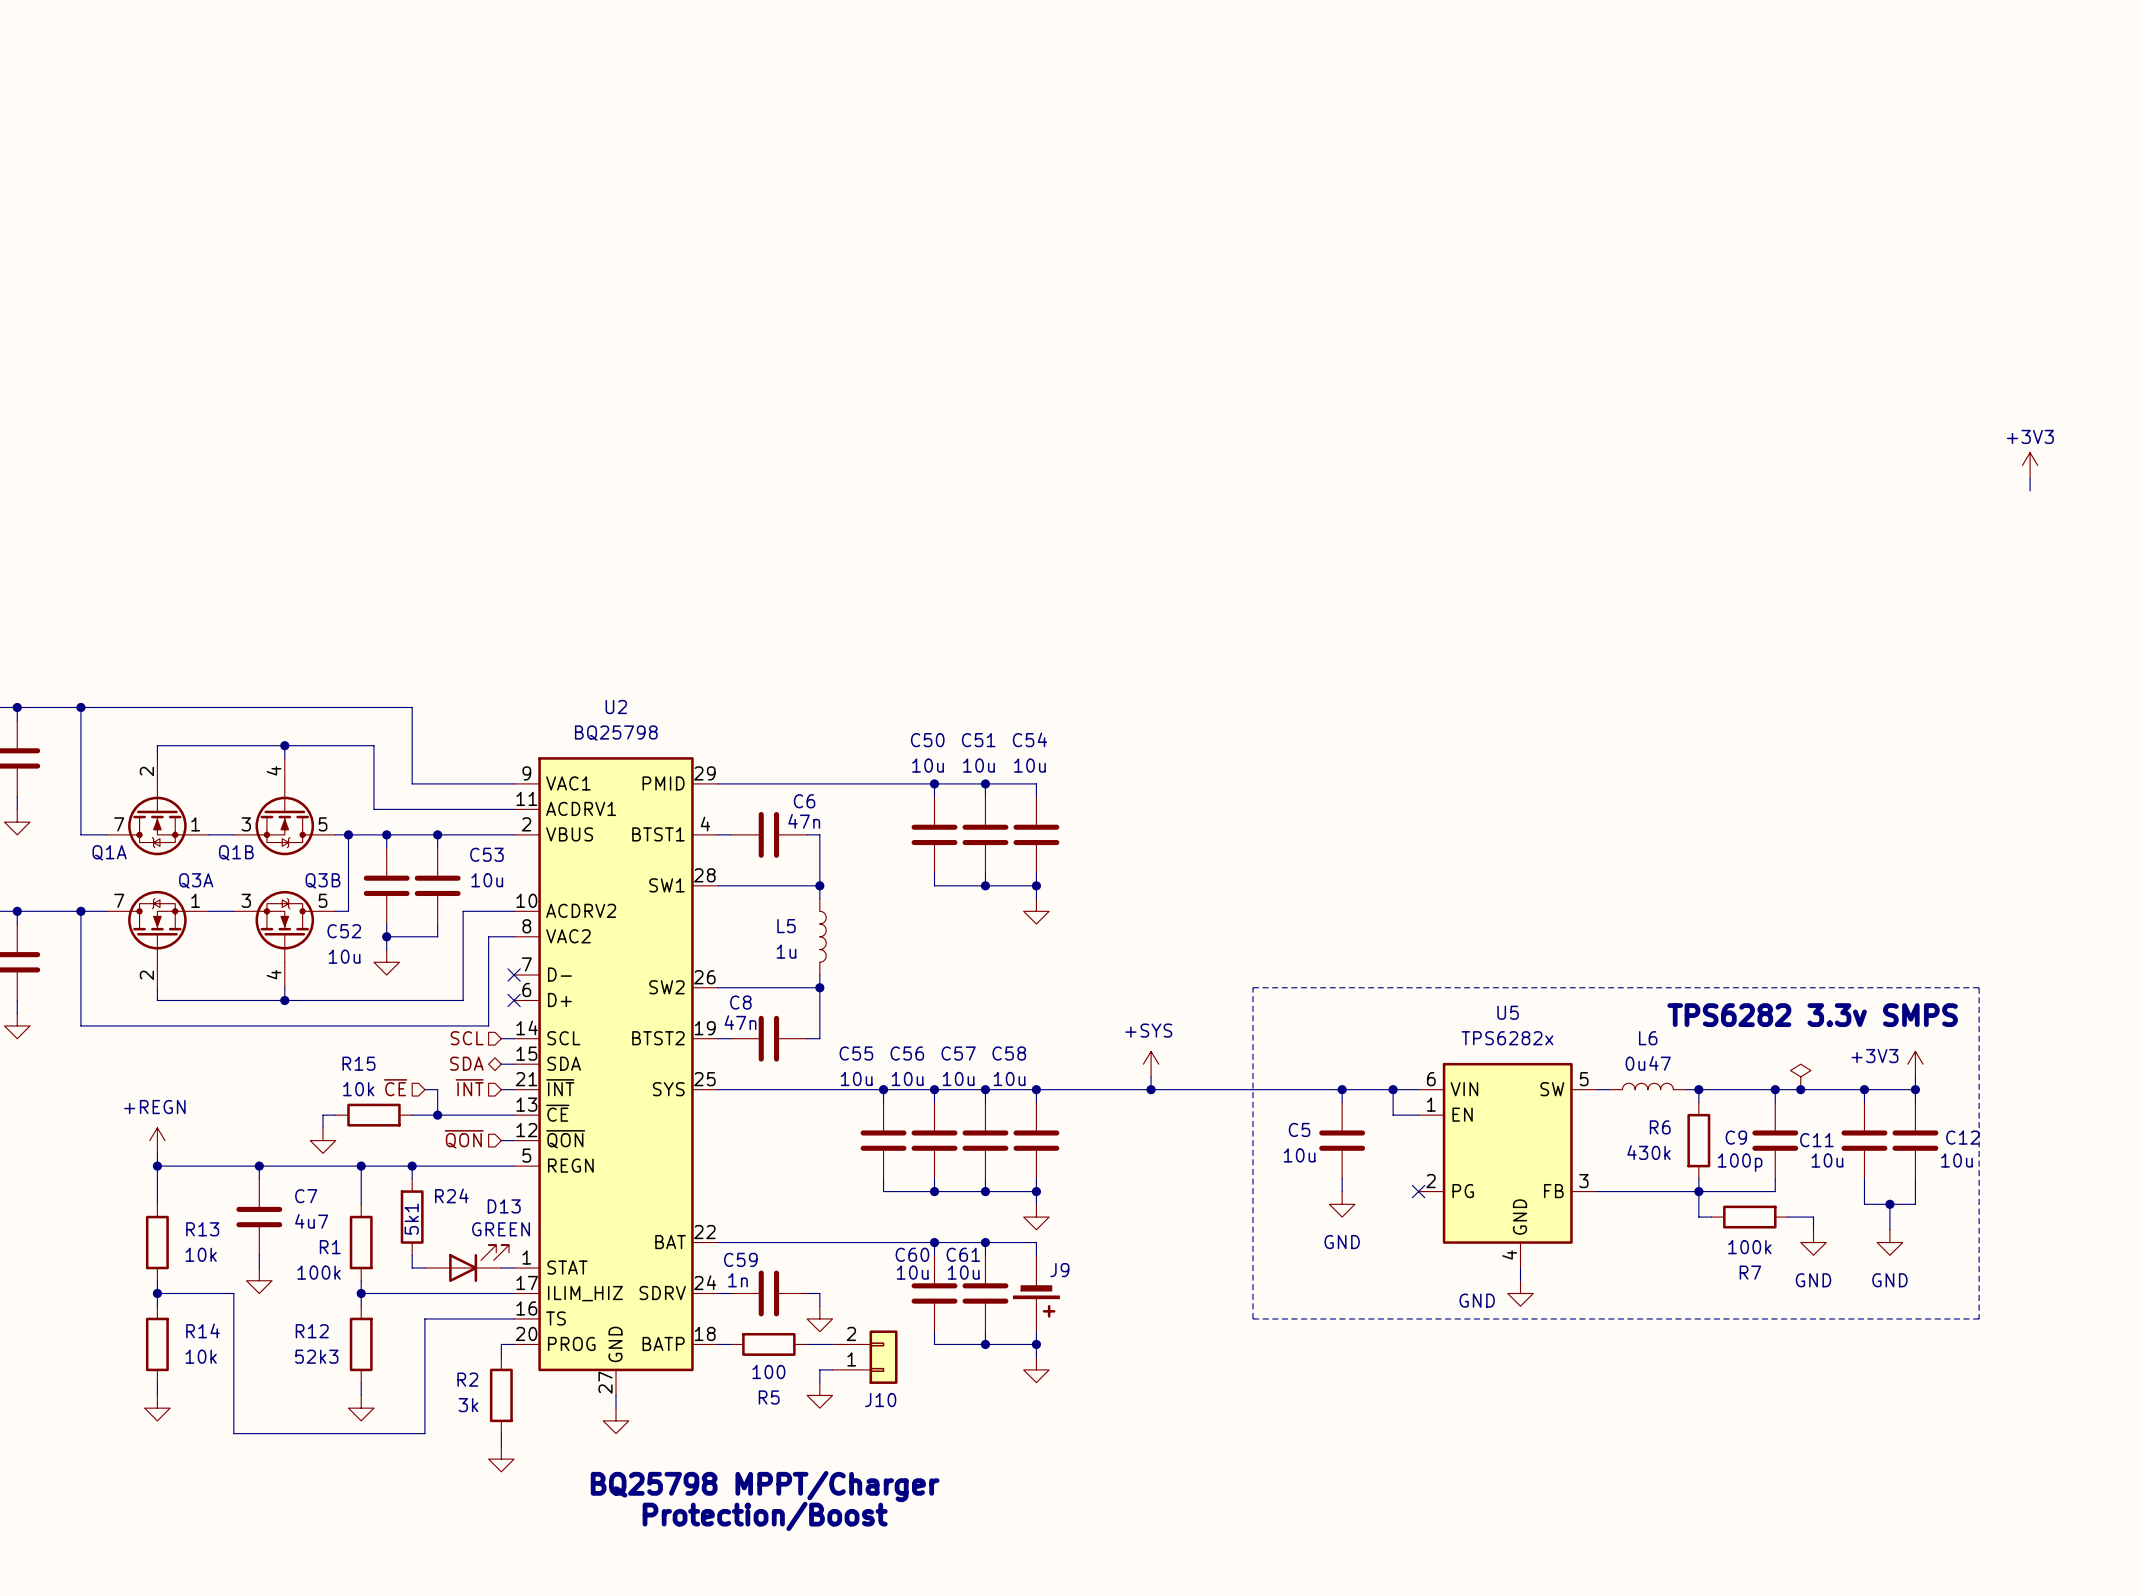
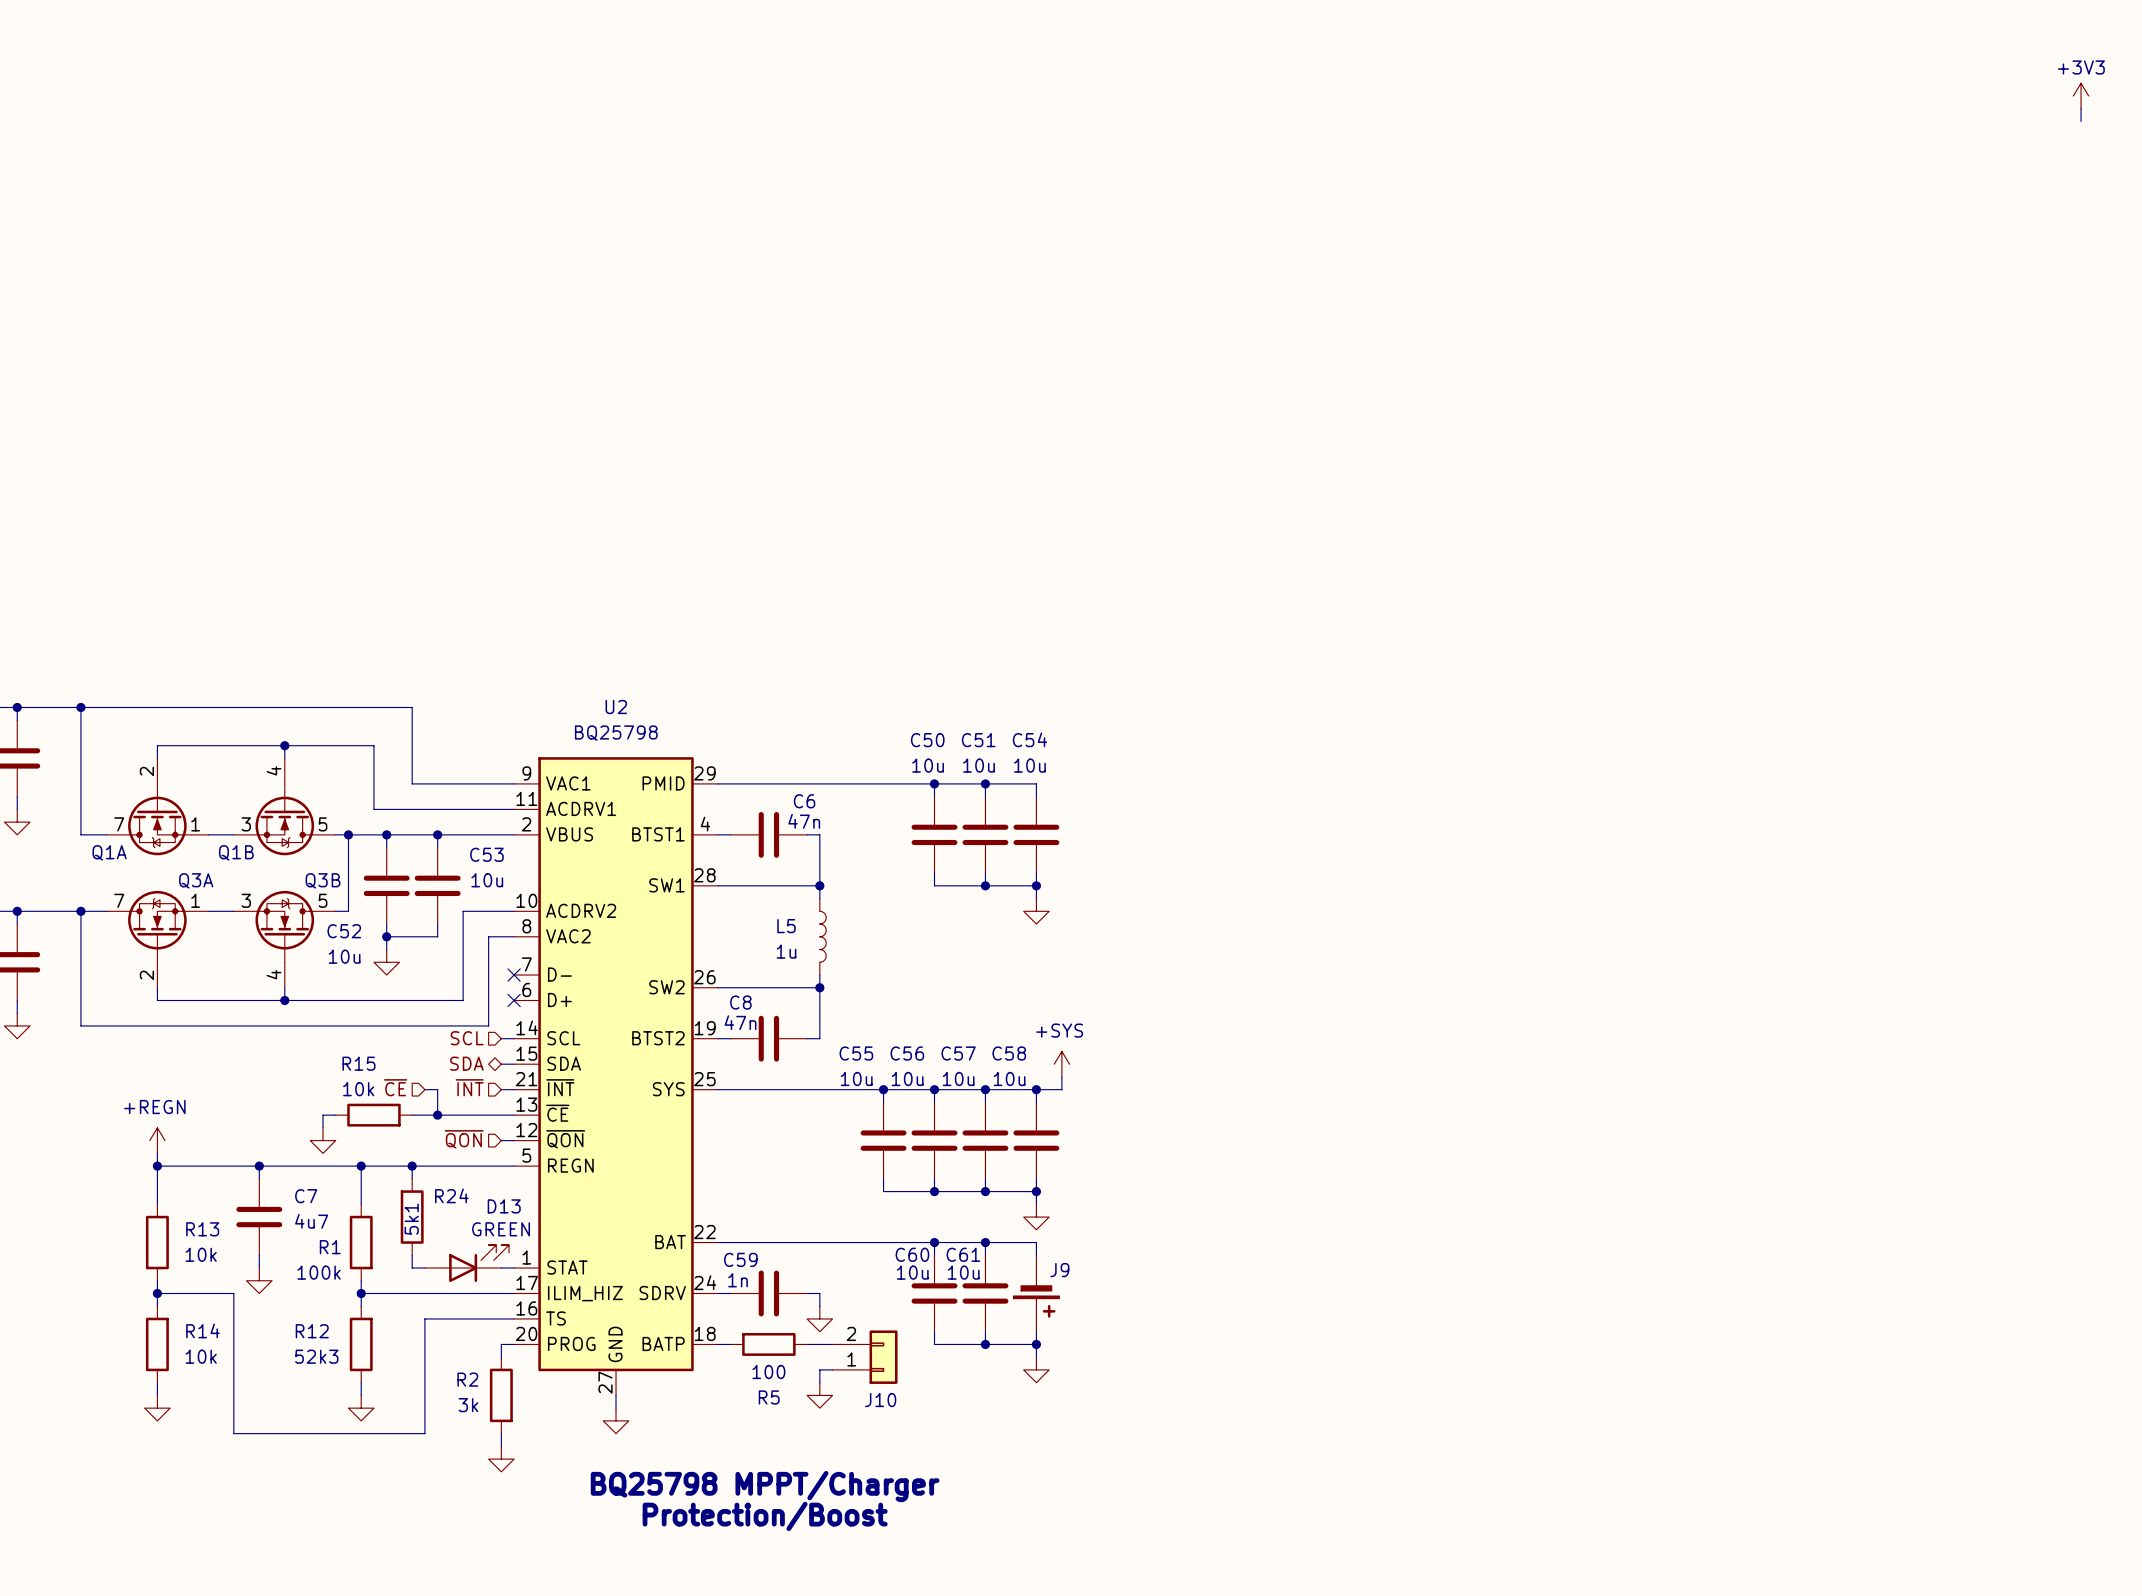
power symbol: none -> +3V3 (2081, 96)
wire: none -> (2081, 108) (2081, 121)
power symbol: +3V3 (2030, 465) -> none
wire: (2030, 478) (2030, 490) -> none
line: (1252, 987) (1979, 987) (1979, 1318) (1252, 1318) (1252, 987) -> none
text: TPS6282 3.3v SMPS (1812, 1015) -> none
power symbol position: +SYS (1151, 1064) -> +SYS (1061, 1064)
power symbol: +3V3 (1915, 1064) -> none
wire: (1151, 1076) (1151, 1089) -> none
power symbol: (1800, 1076) -> none
wire: (1915, 1076) (1915, 1102) -> none
L6: 0u47 (1647, 1086) -> none
wire: (1061, 1089) (1418, 1089) -> (1061, 1089) (1061, 1076)
junction: (1151, 1089) -> none
wire: (1342, 1089) (1342, 1102) -> none
junction: (1342, 1089) -> none
wire: (1393, 1089) (1393, 1115) (1418, 1115) -> none
junction: (1393, 1089) -> none
wire: (1596, 1089) (1609, 1089) -> none
wire: (1686, 1089) (1915, 1089) -> none
wire: (1698, 1089) (1698, 1102) -> none
junction: (1698, 1089) -> none
wire: (1775, 1089) (1775, 1102) -> none
junction: (1775, 1089) -> none
junction: (1800, 1089) -> none
wire: (1864, 1089) (1864, 1102) -> none
junction: (1864, 1089) -> none
junction: (1915, 1089) -> none
C5: 10u (1342, 1140) -> none
R6: 430k (1698, 1140) -> none
C9: 100p (1775, 1140) -> none
C11: 10u (1864, 1140) -> none
C12: 10u (1915, 1140) -> none
U5: TPS6282x (1507, 1165) -> none
wire: (1342, 1178) (1342, 1191) -> none
wire: (1698, 1178) (1698, 1217) (1711, 1217) -> none
wire: (1775, 1178) (1775, 1191) (1596, 1191) -> none
wire: (1864, 1178) (1864, 1204) (1915, 1204) (1915, 1178) -> none
no-connect mark: (1418, 1191) -> none
junction: (1698, 1191) -> none
power symbol: GND (1342, 1204) -> none
wire: (1889, 1204) (1889, 1229) -> none
junction: (1889, 1204) -> none
R7: 100k (1749, 1217) -> none
wire: (1788, 1217) (1813, 1217) (1813, 1229) -> none
power symbol: GND (1813, 1242) -> none
power symbol: GND (1889, 1242) -> none
wire: (1520, 1268) (1520, 1280) -> none
power symbol: GND (1520, 1293) -> none

